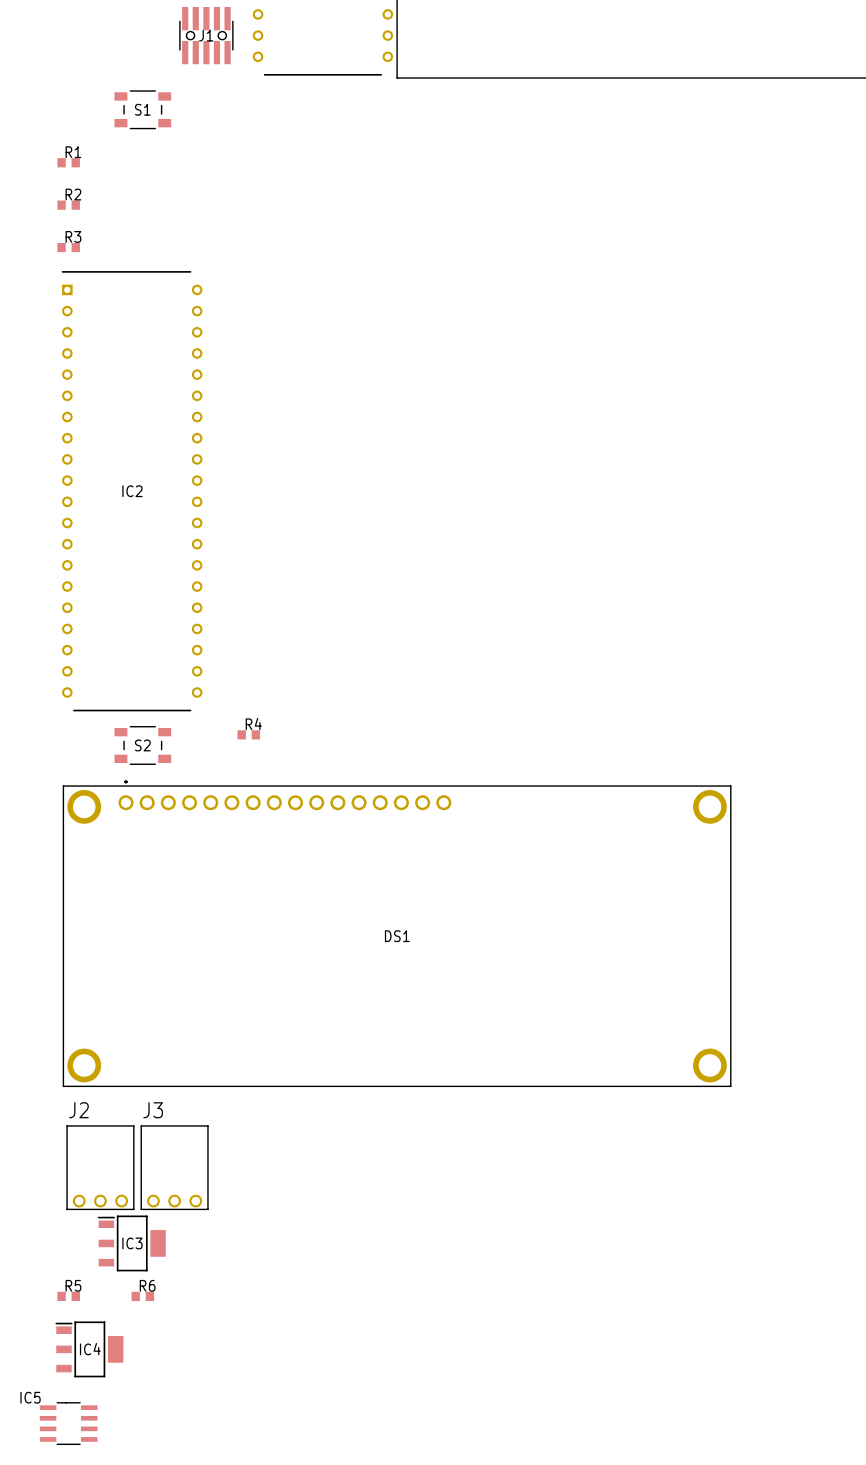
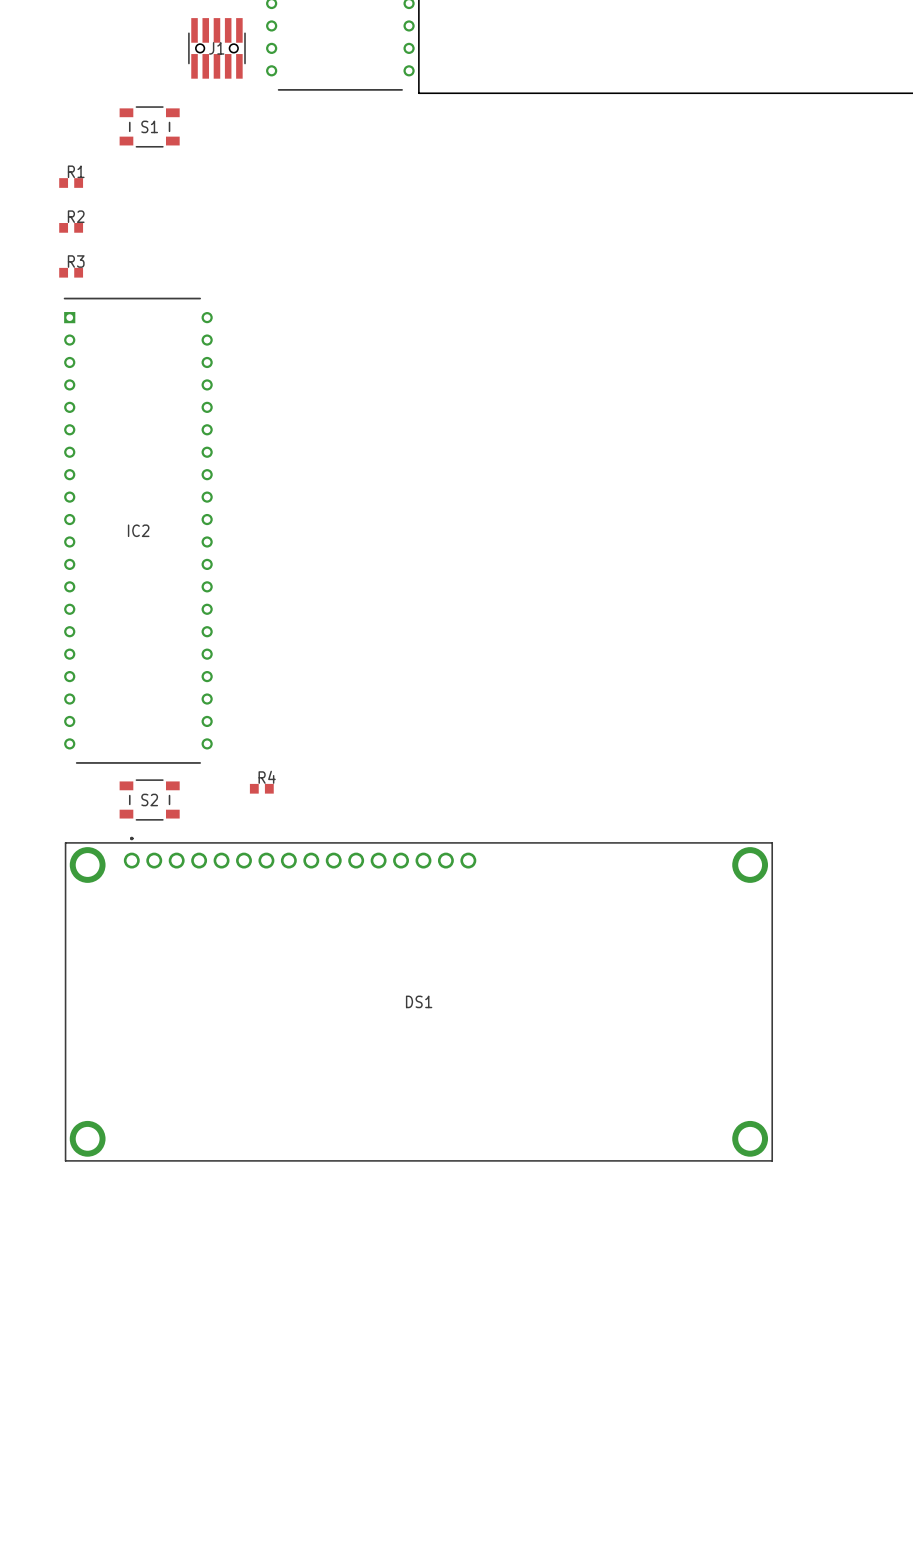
J2: (100, 1167) -> none
J3: (174, 1167) -> none
IC3: (131, 1243) -> none
R5: (68, 1296) -> none
R6: (142, 1296) -> none
IC4: (89, 1349) -> none
IC5: (68, 1423) -> none

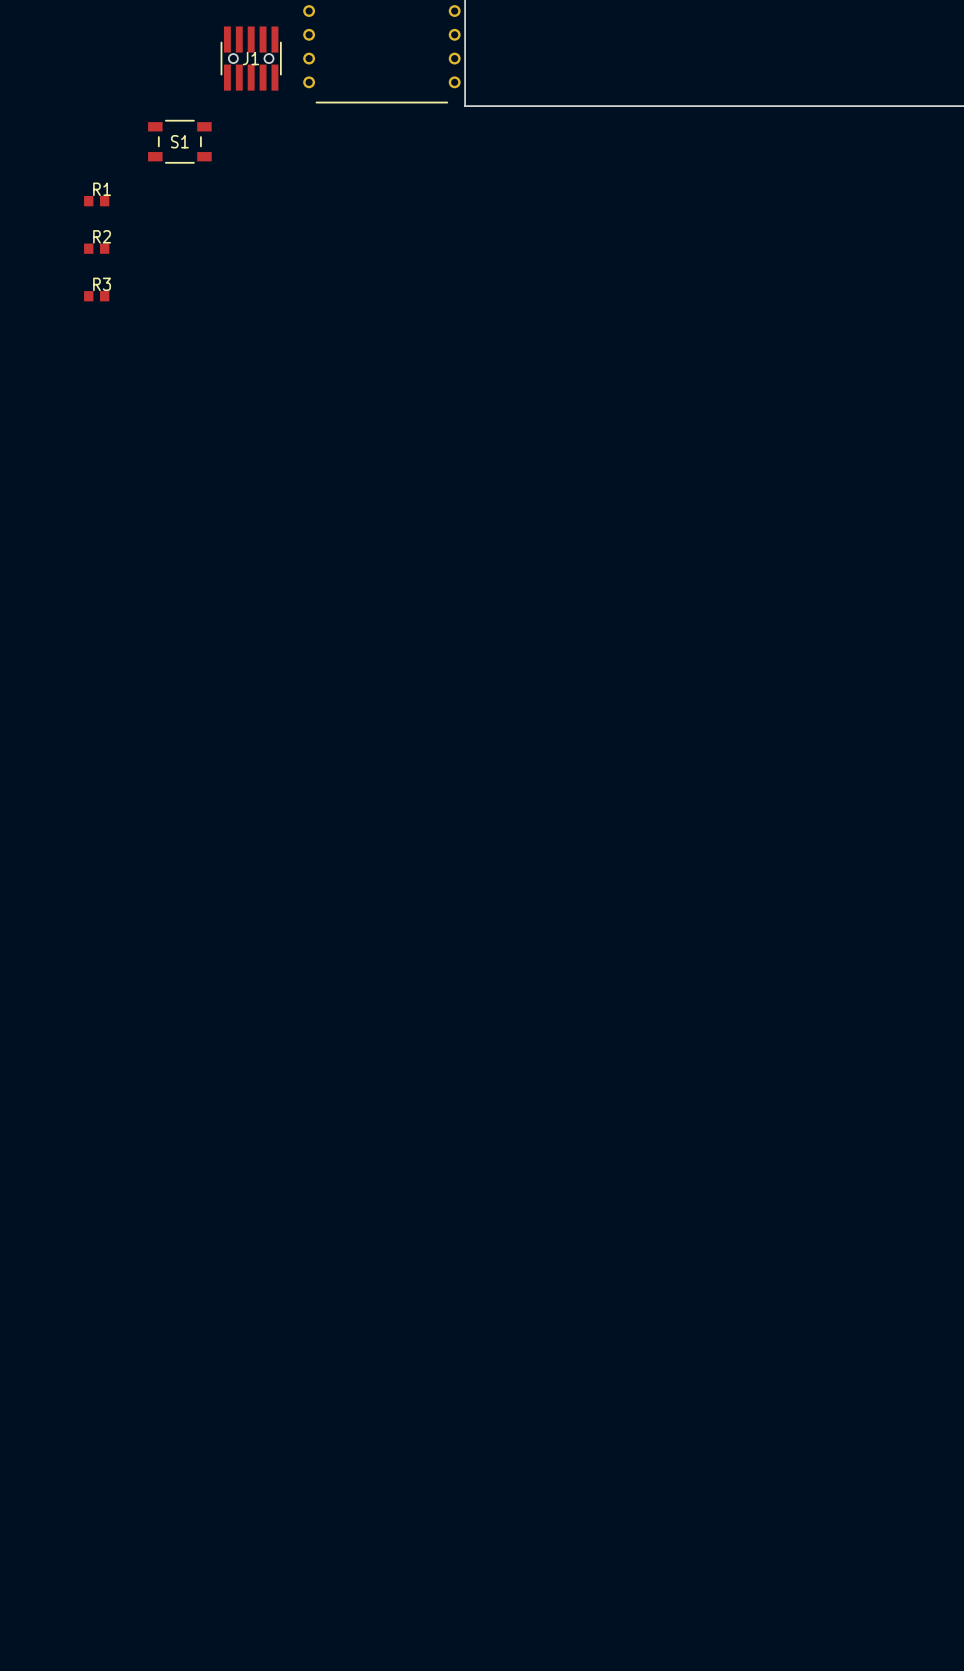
IC2: (138, 530) -> none
R4: (261, 788) -> none
S2: (149, 799) -> none
DS1: (418, 999) -> none

